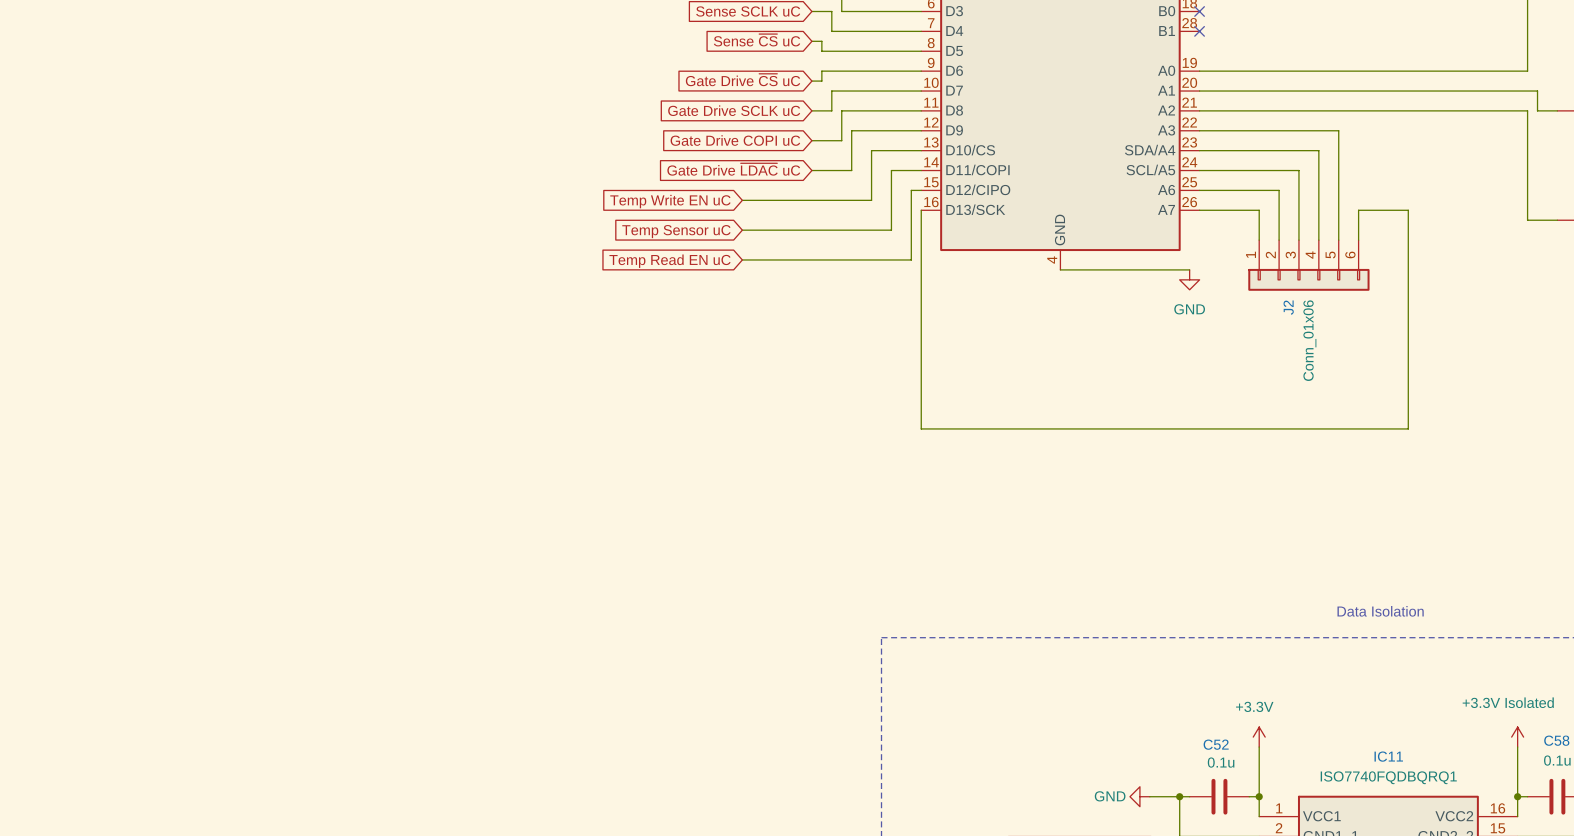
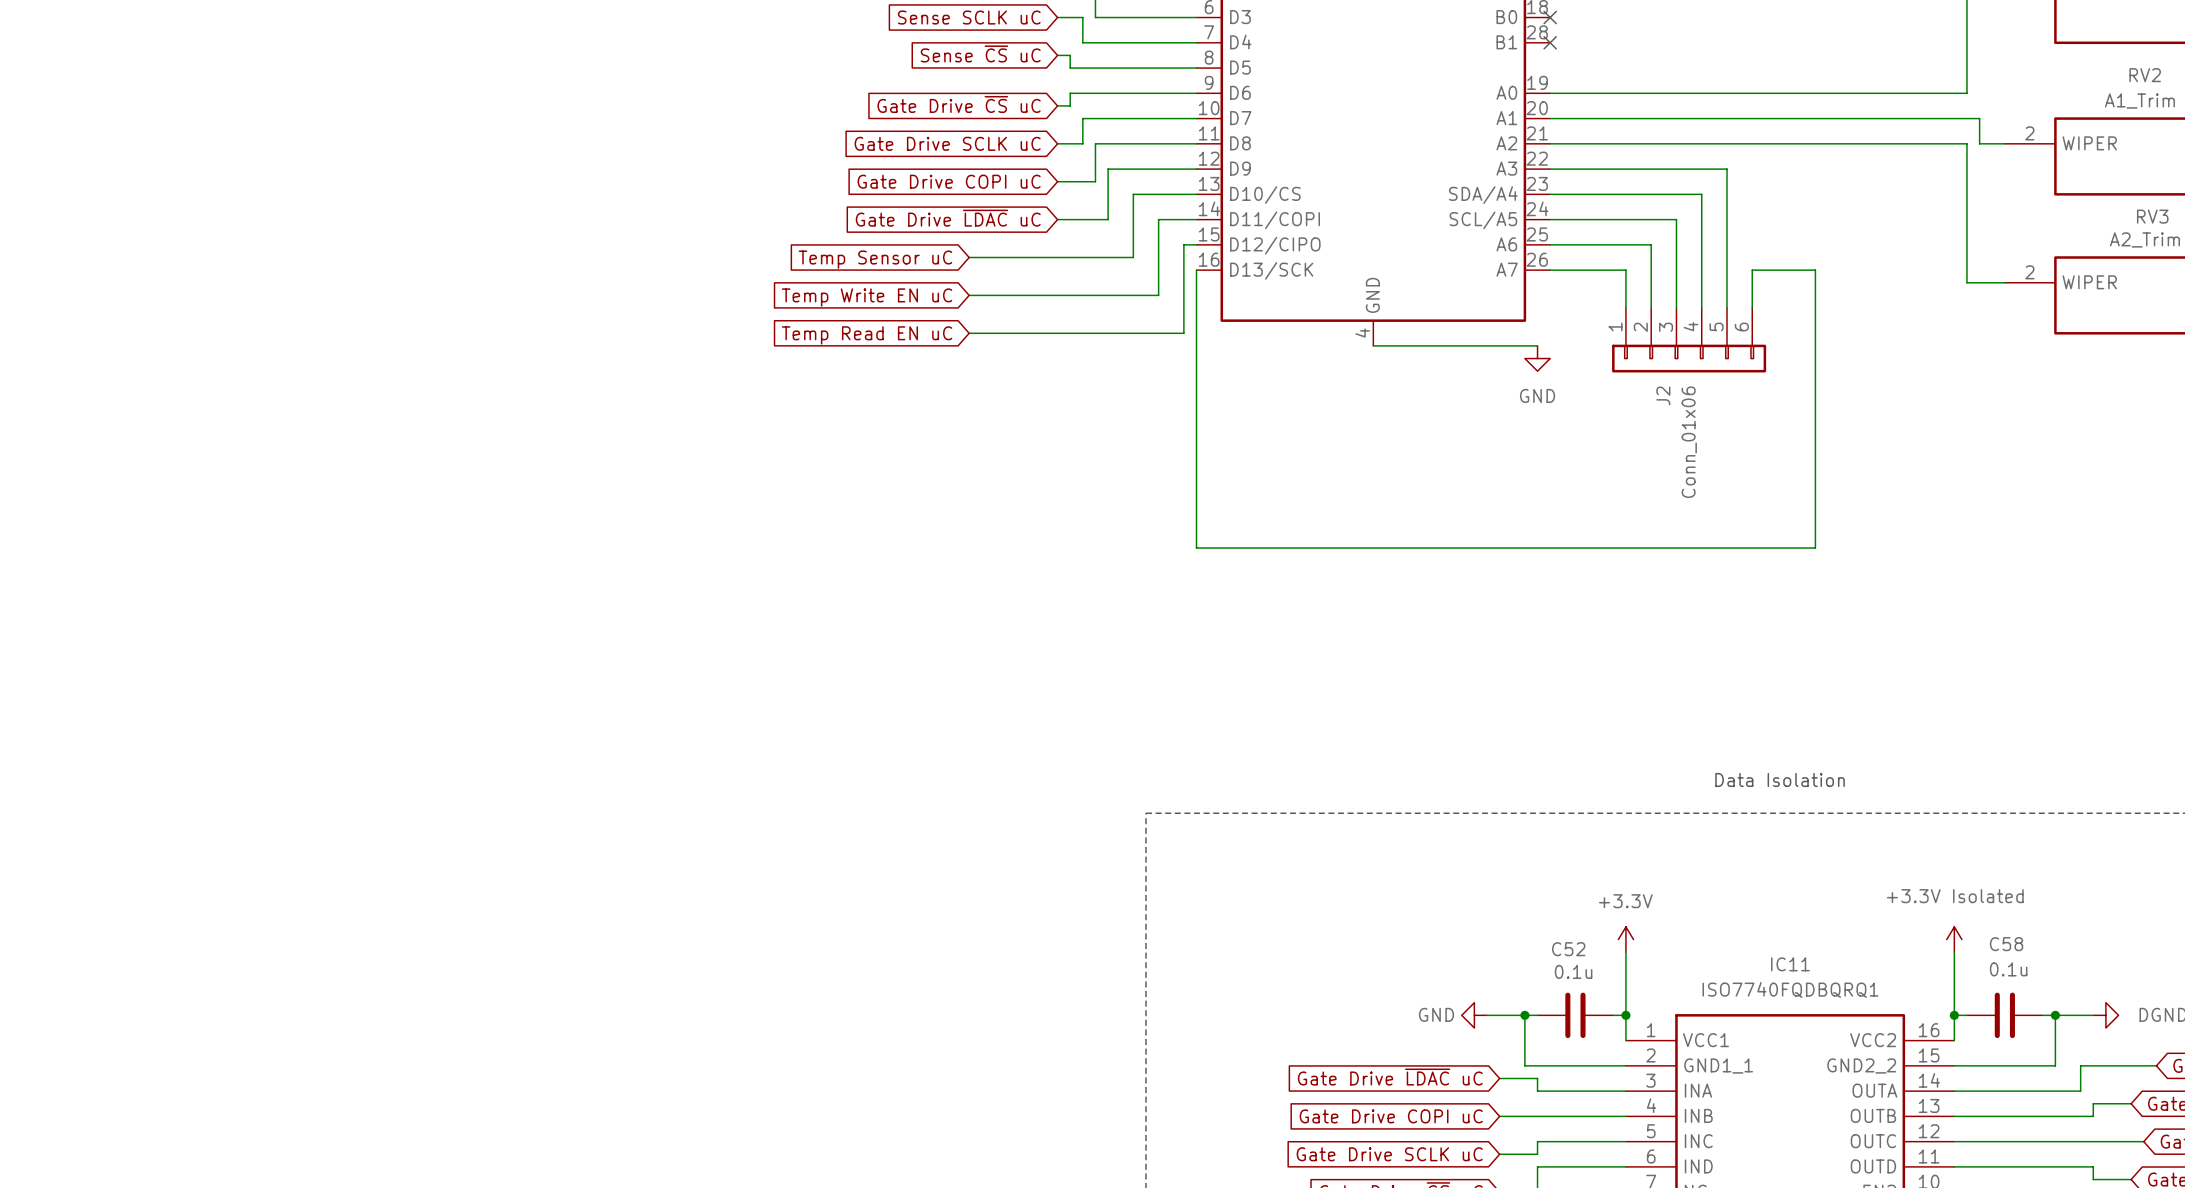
global label: Temp Write EN uC (670, 201) -> Temp Sensor uC (875, 259)
global label: Temp Sensor uC (676, 231) -> Temp Write EN uC (867, 297)

